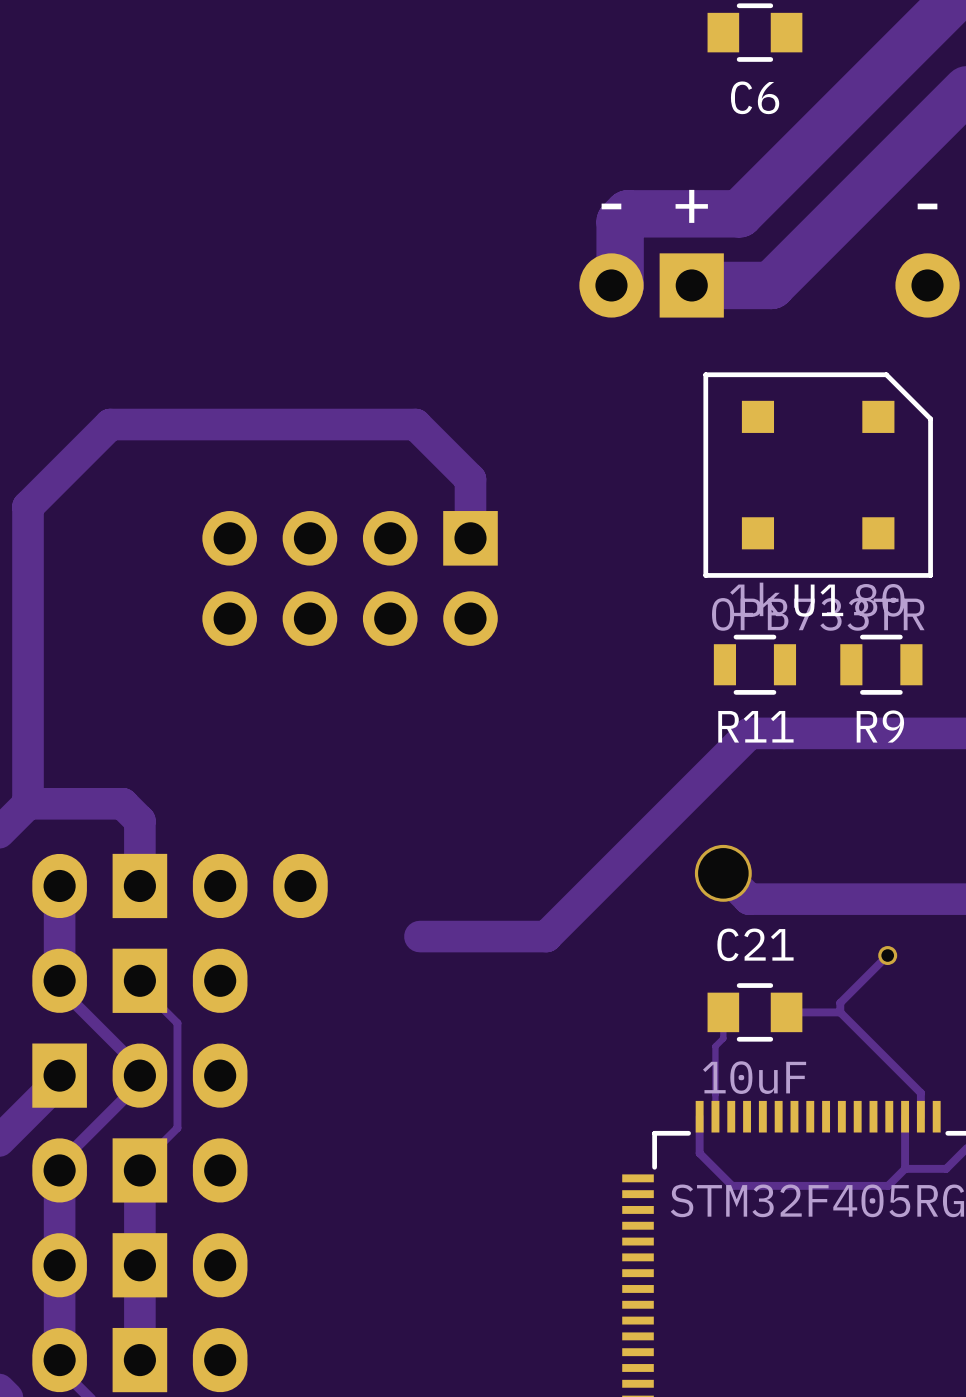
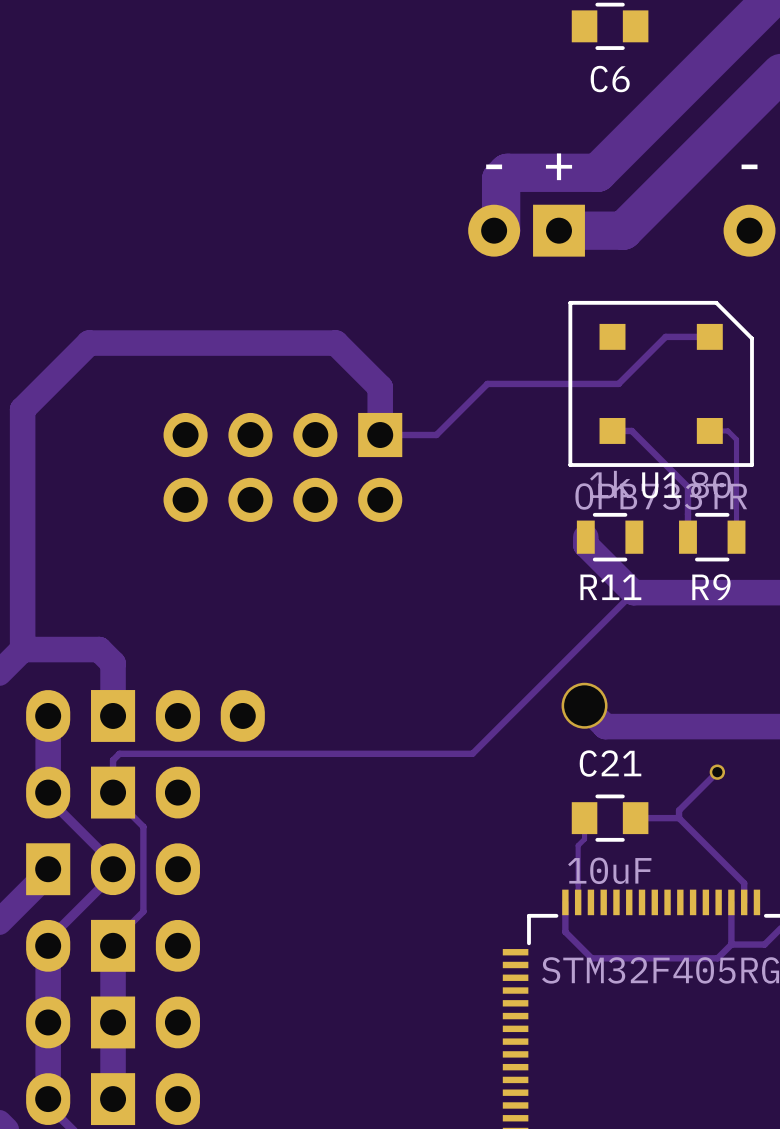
track: none -> (709, 336) (665, 336) (618, 383) (487, 383) (436, 435) (380, 435)
track: none -> (612, 430) (631, 430) (687, 487) (687, 537)
track: none -> (709, 430) (727, 430) (736, 439) (736, 537)
track: none -> (585, 537) (585, 544) (633, 592) (472, 753) (119, 753) (113, 760) (113, 792)
track: (784, 733) (749, 733) (546, 936) (419, 936) -> none

